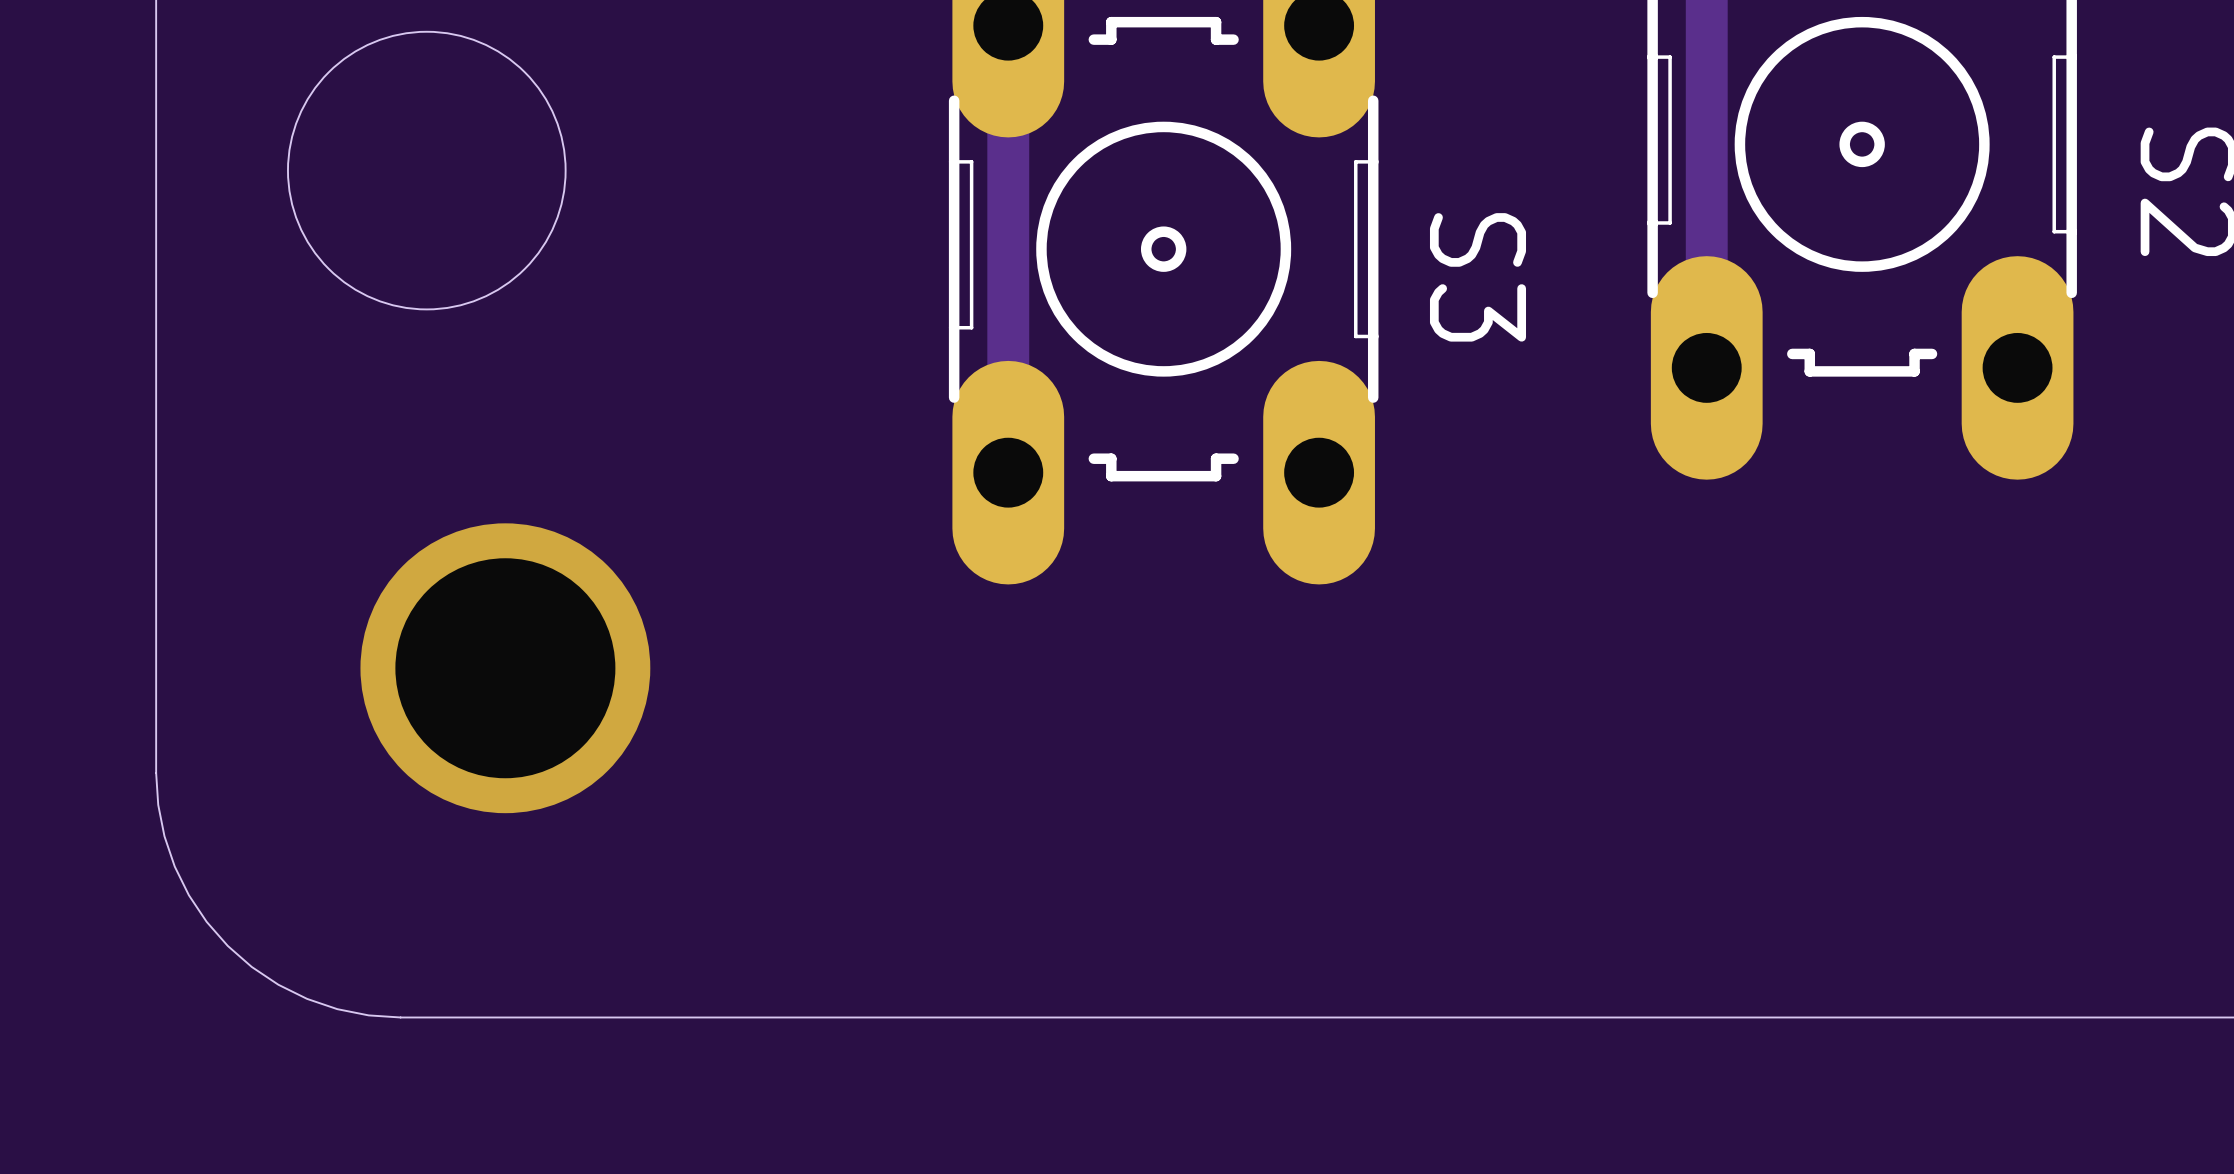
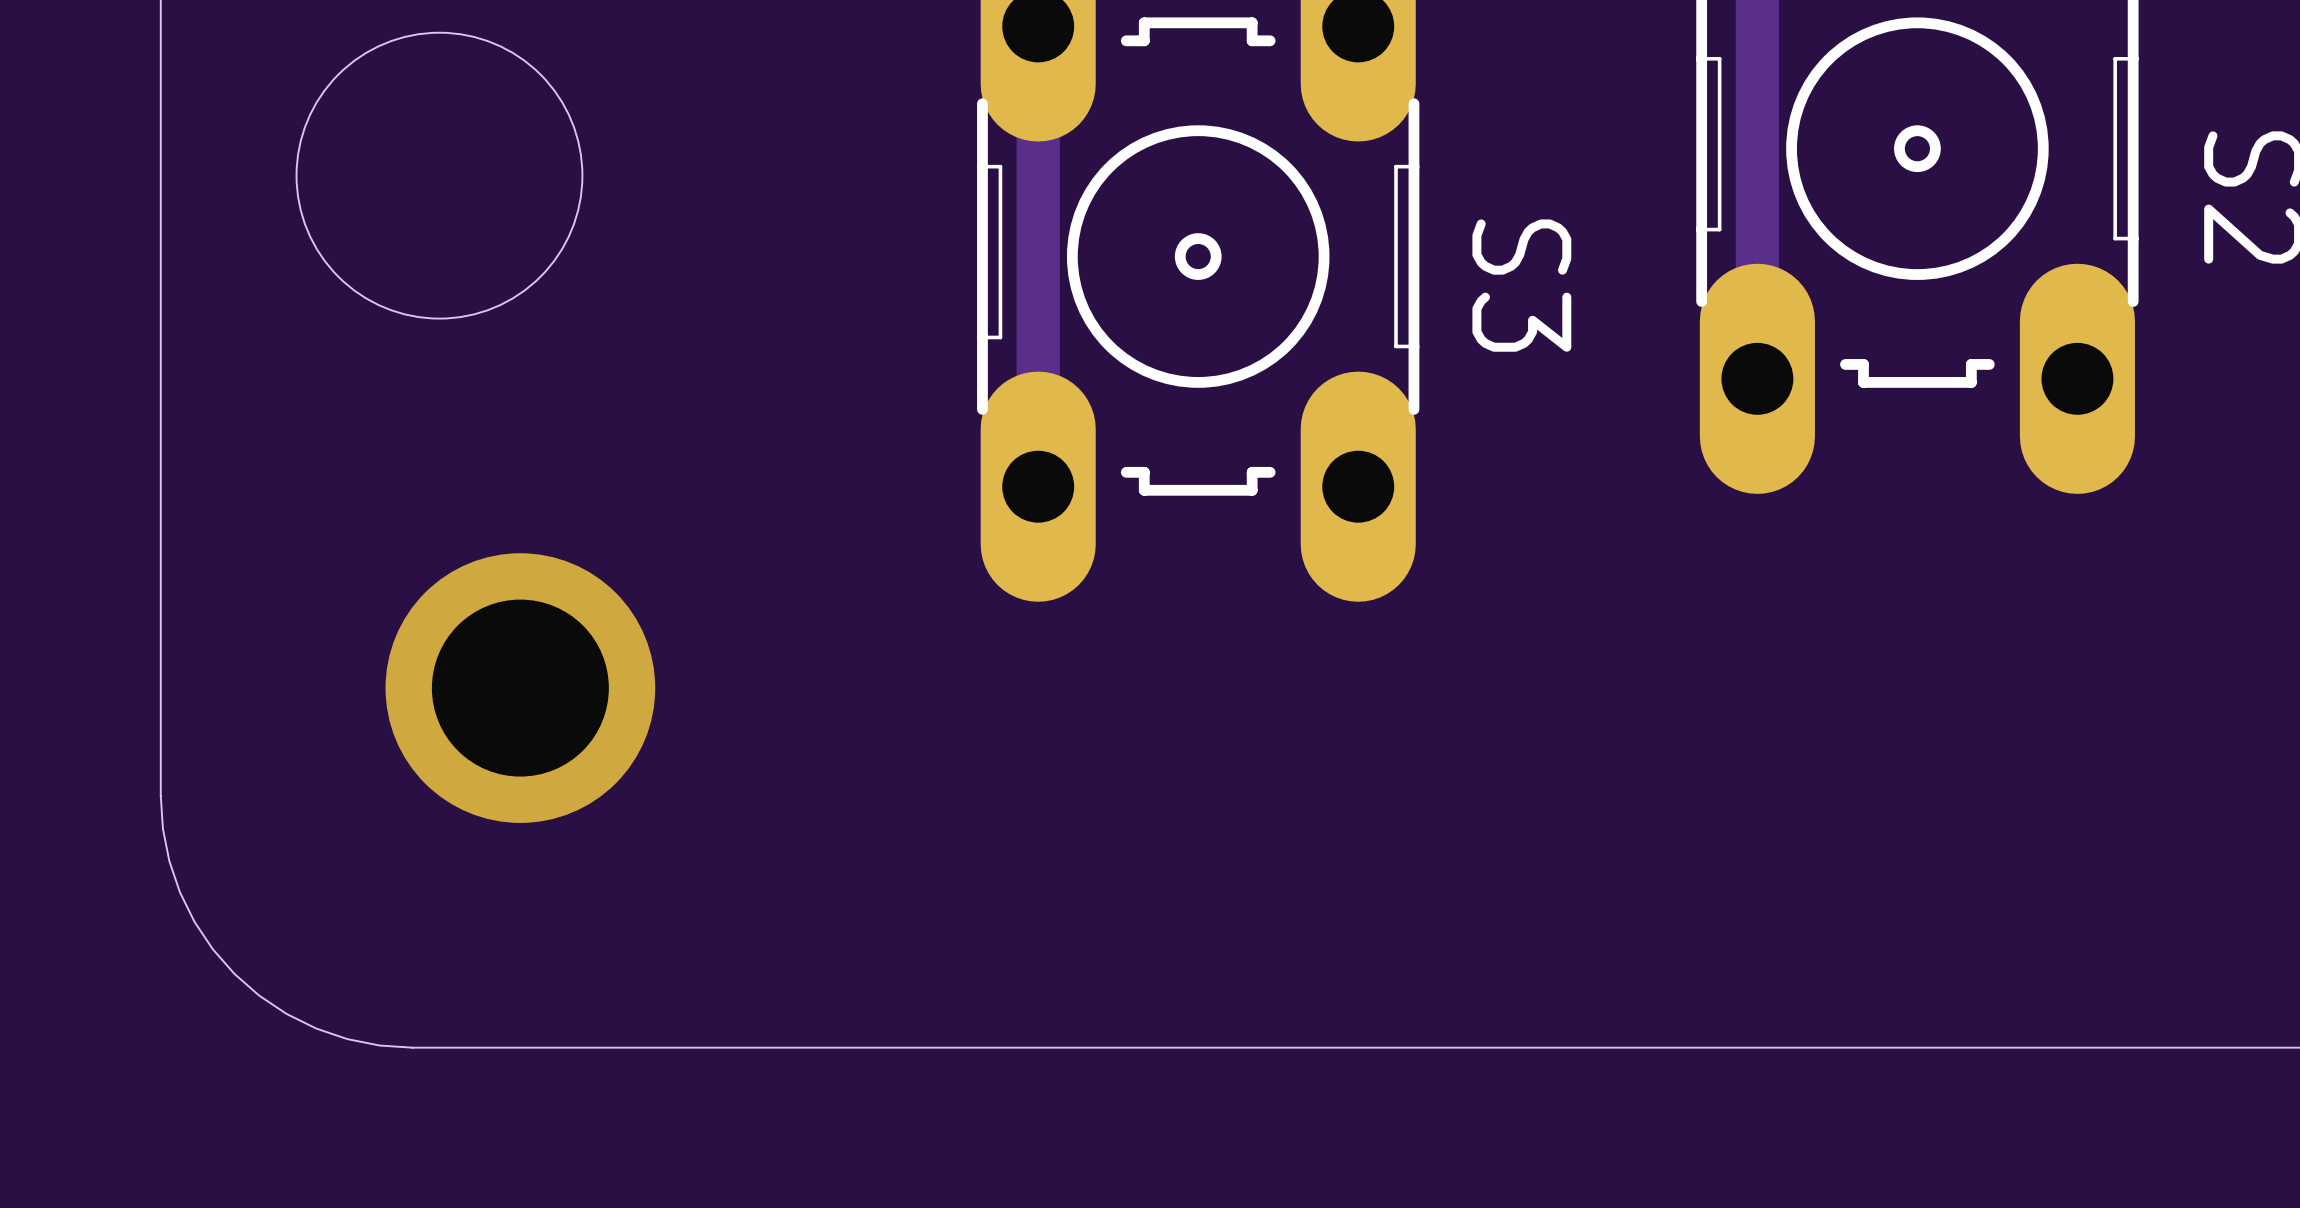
via size: [360, 523, 651, 814] -> [385, 553, 656, 823]

